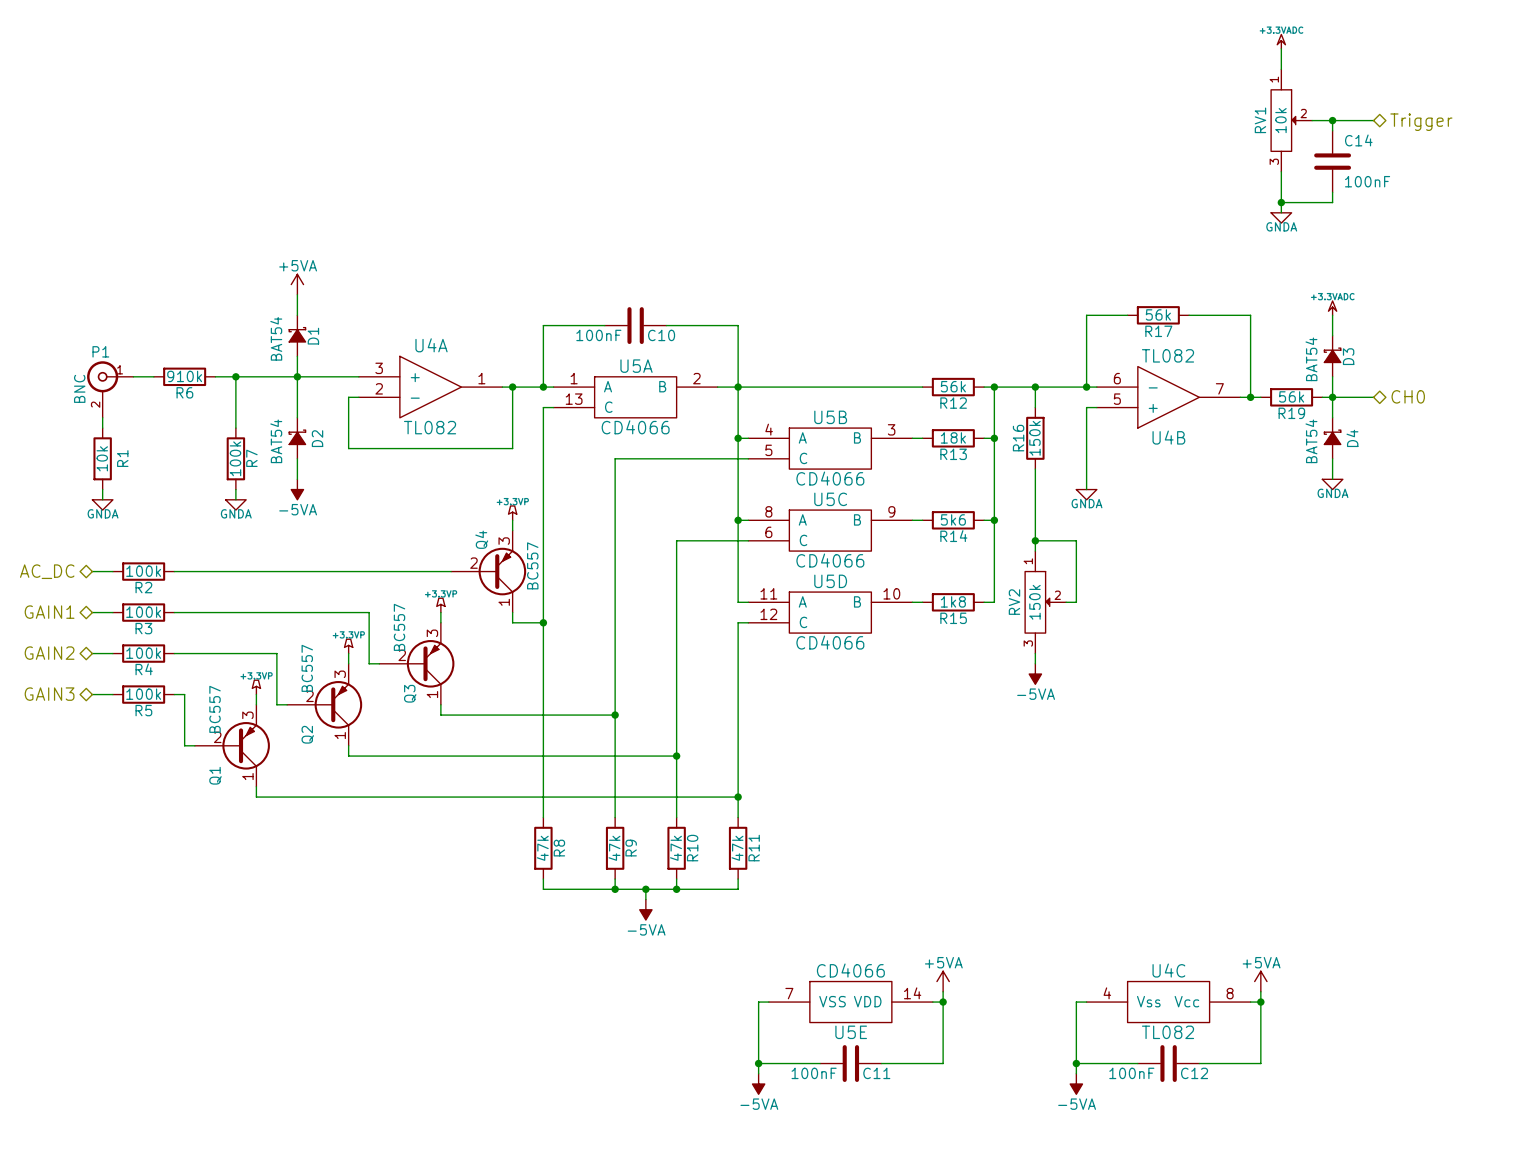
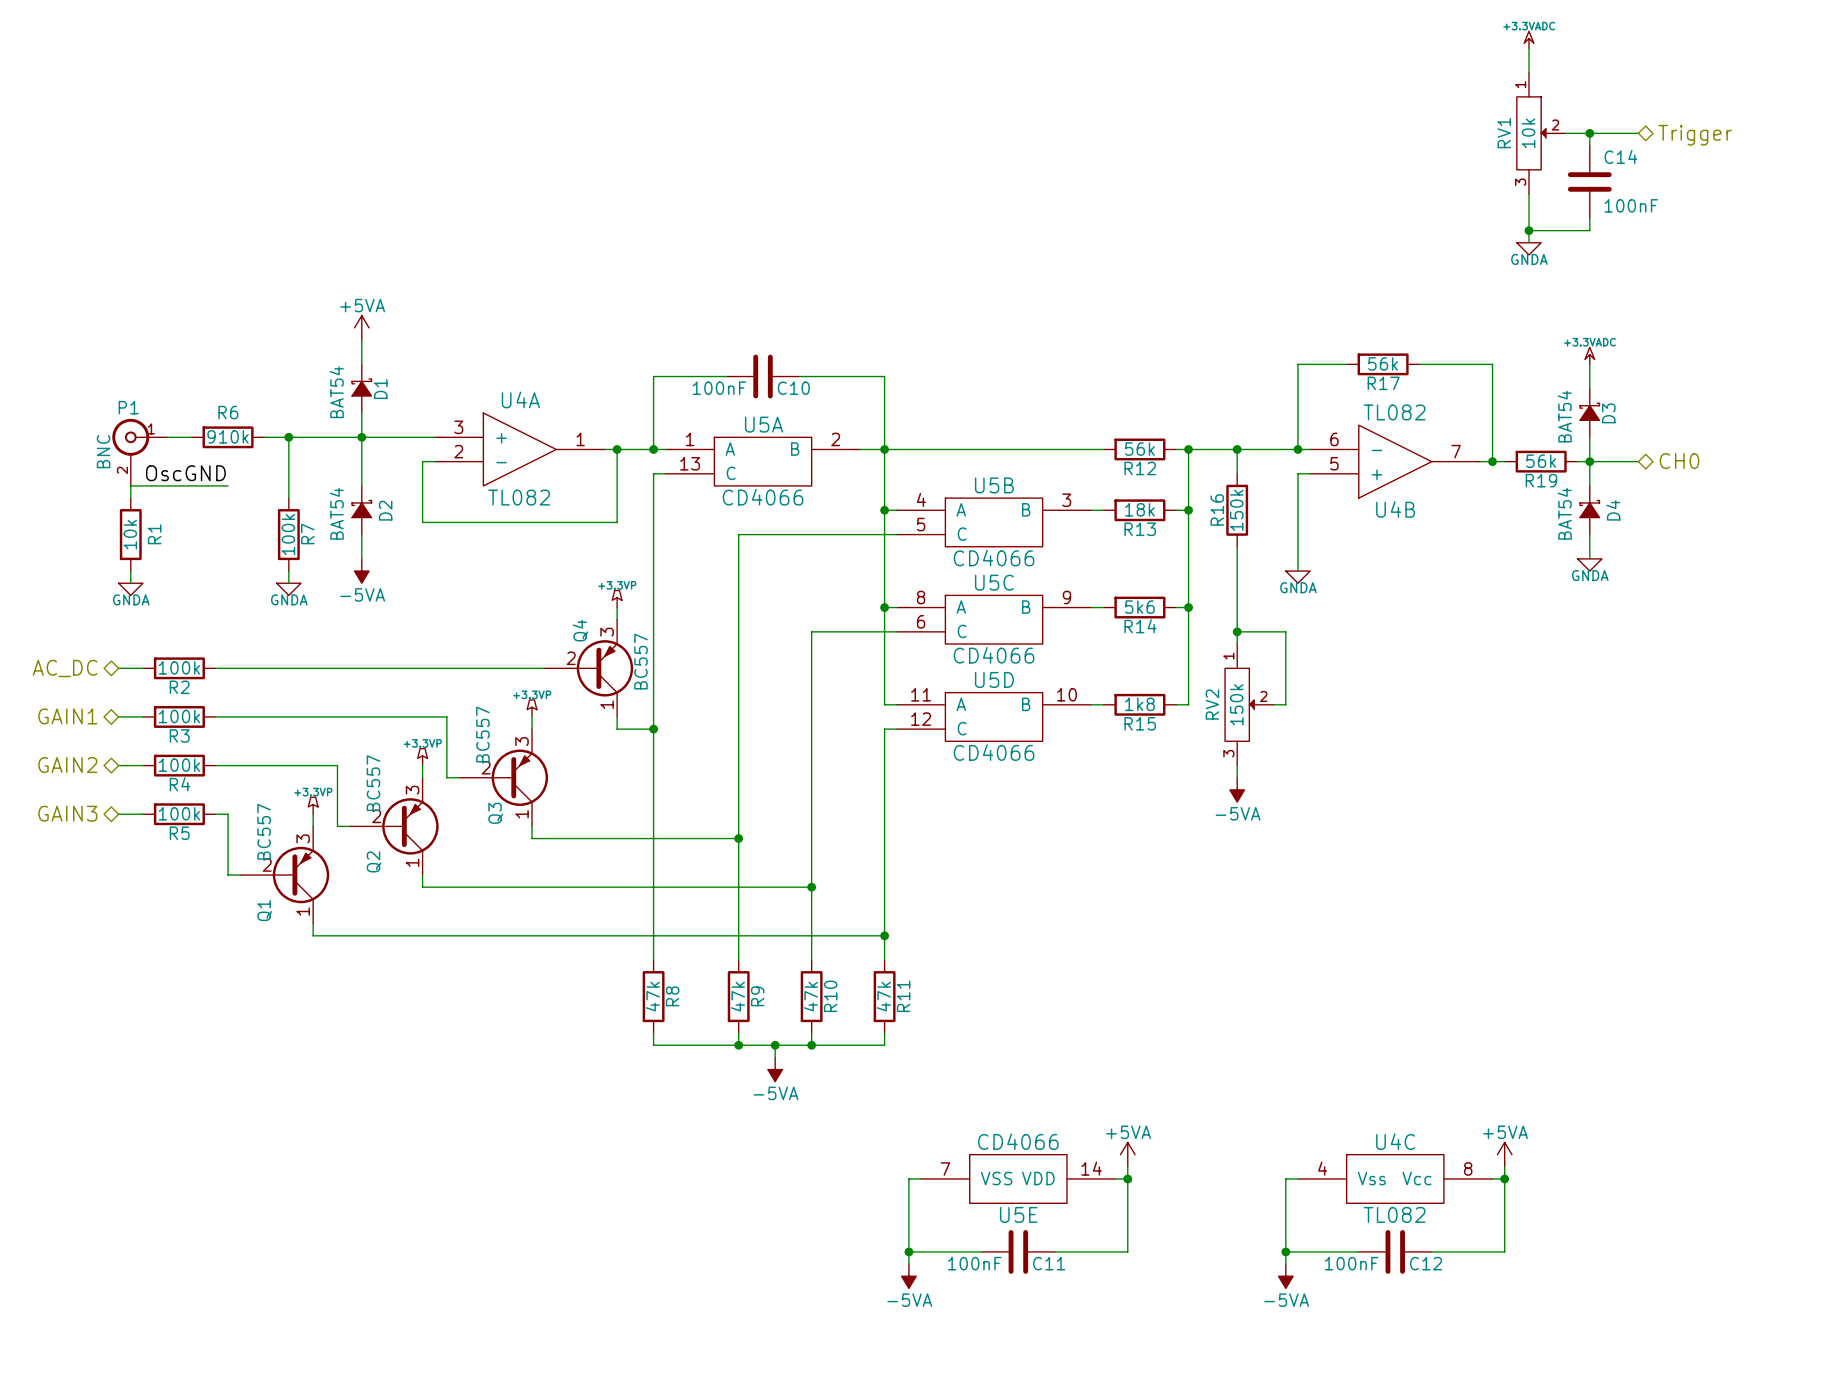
R6 name position: R6 (184, 392) -> R6 (228, 412)
label: none -> OscGND (185, 473)
wire: none -> (130, 485) (228, 485)

